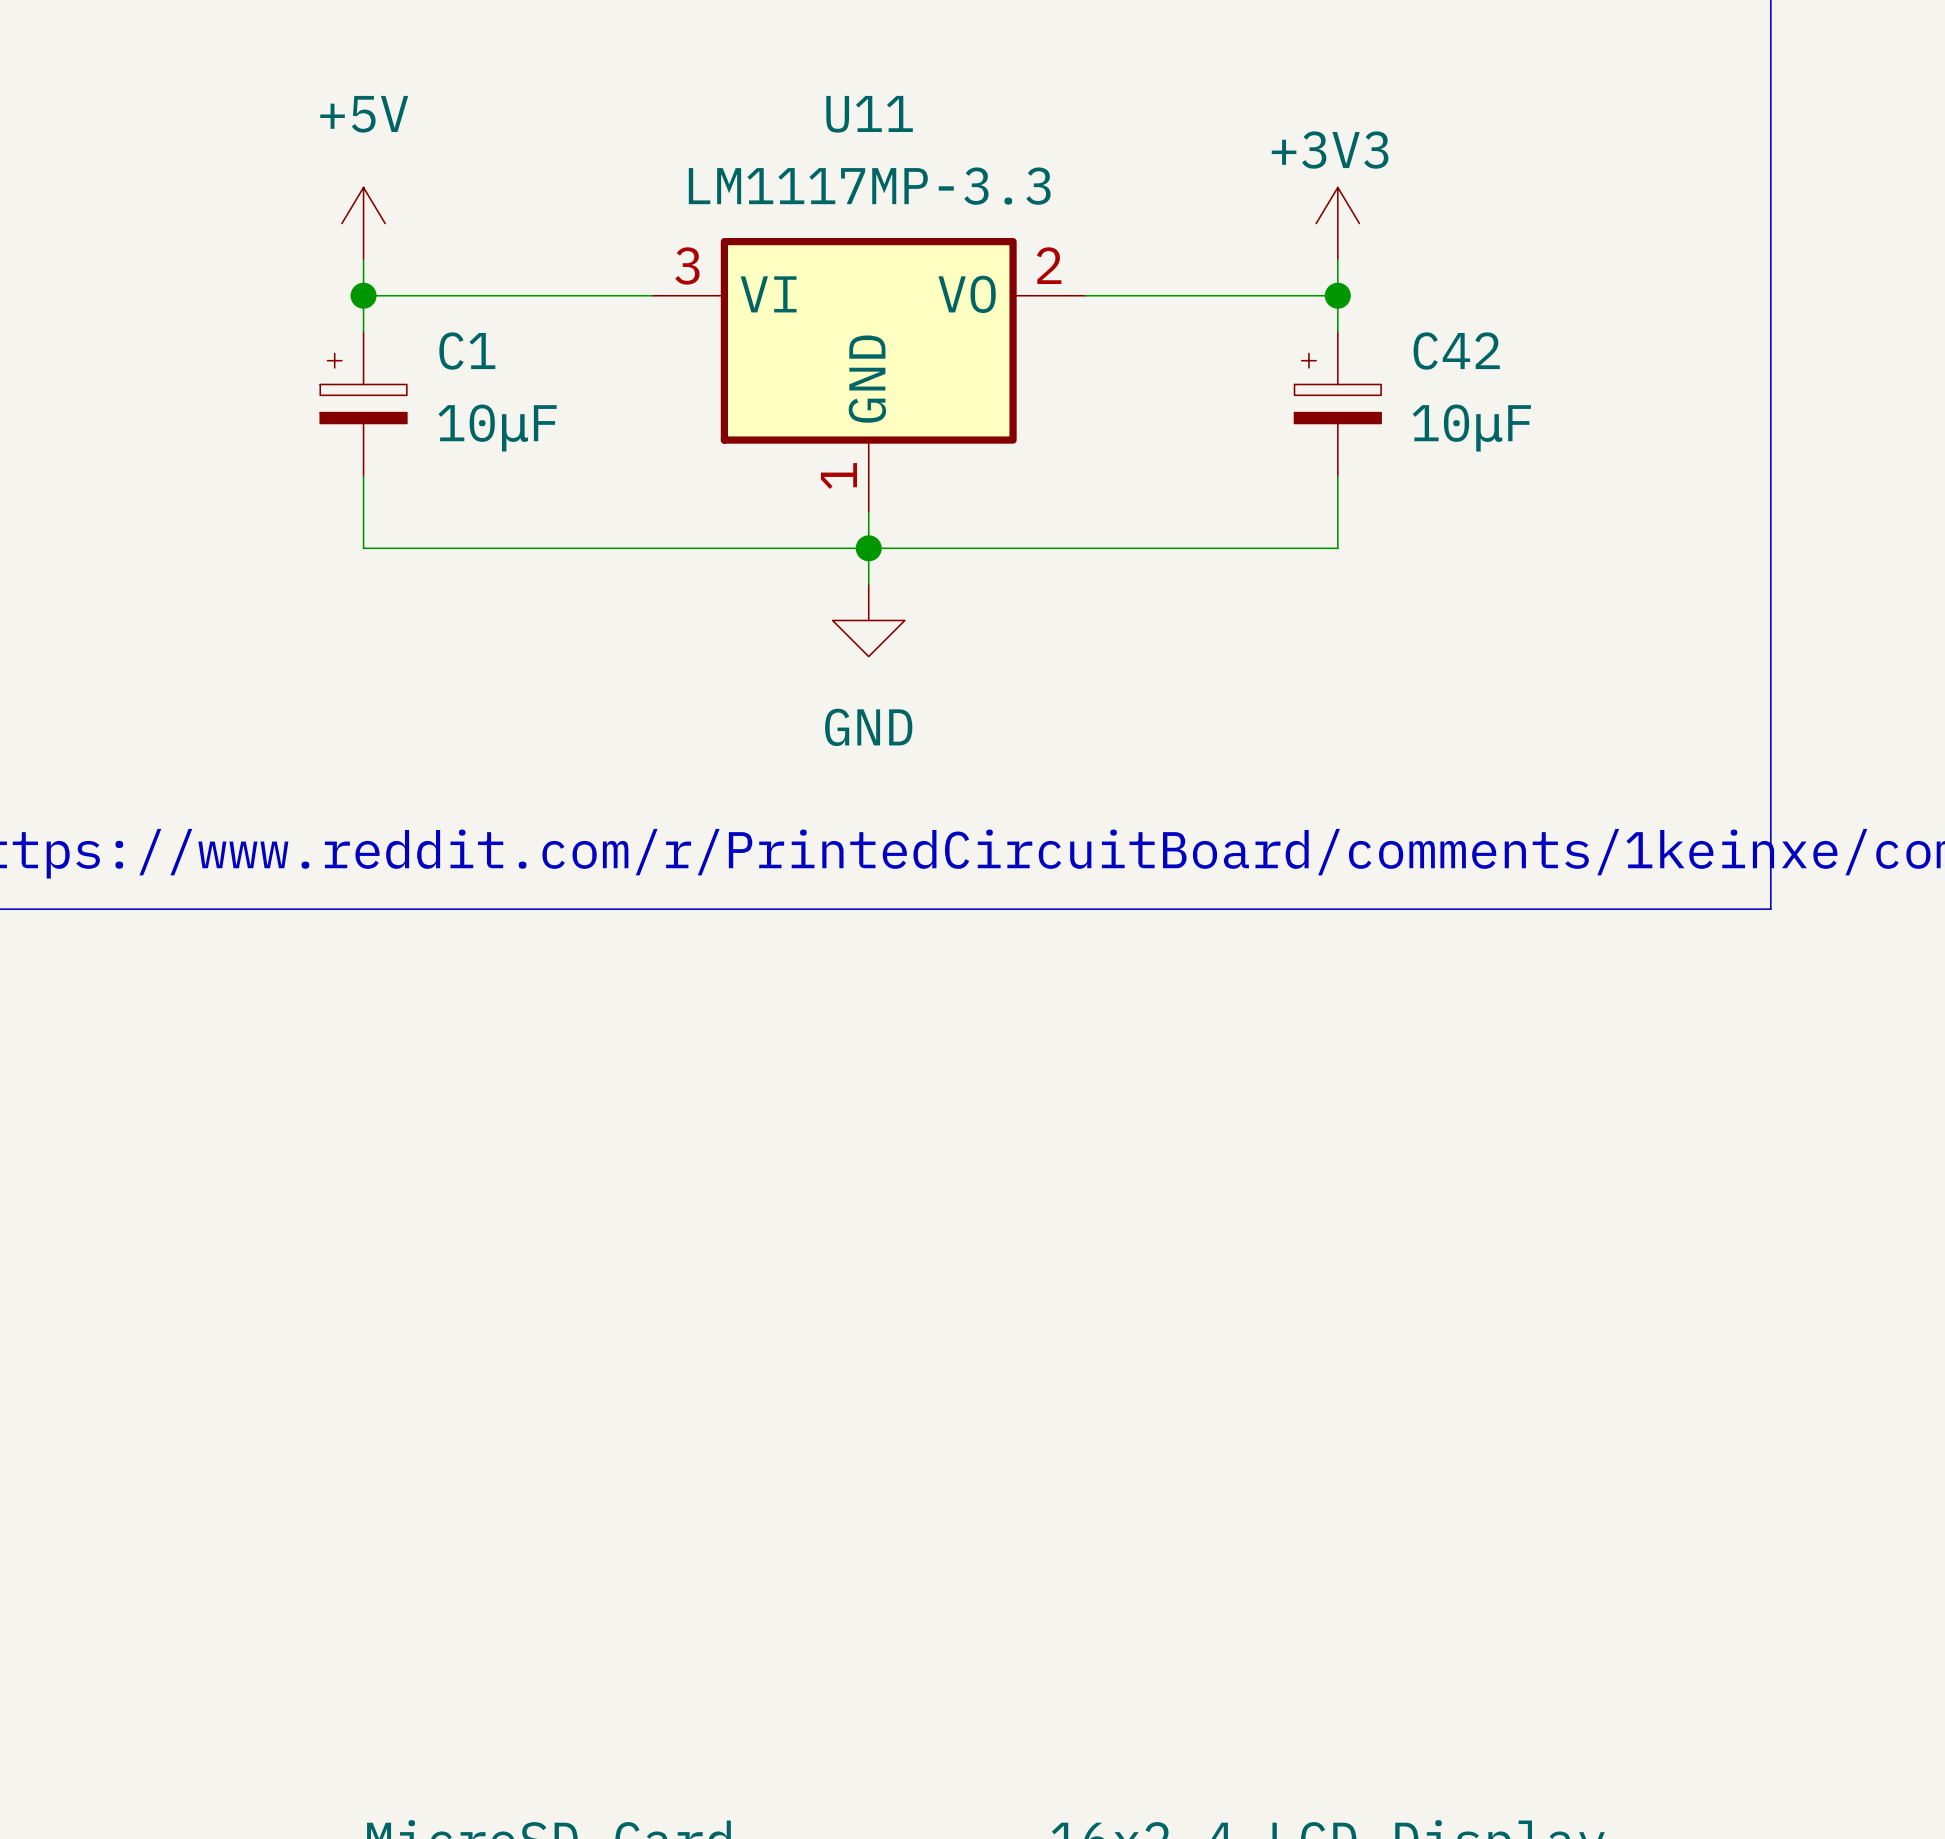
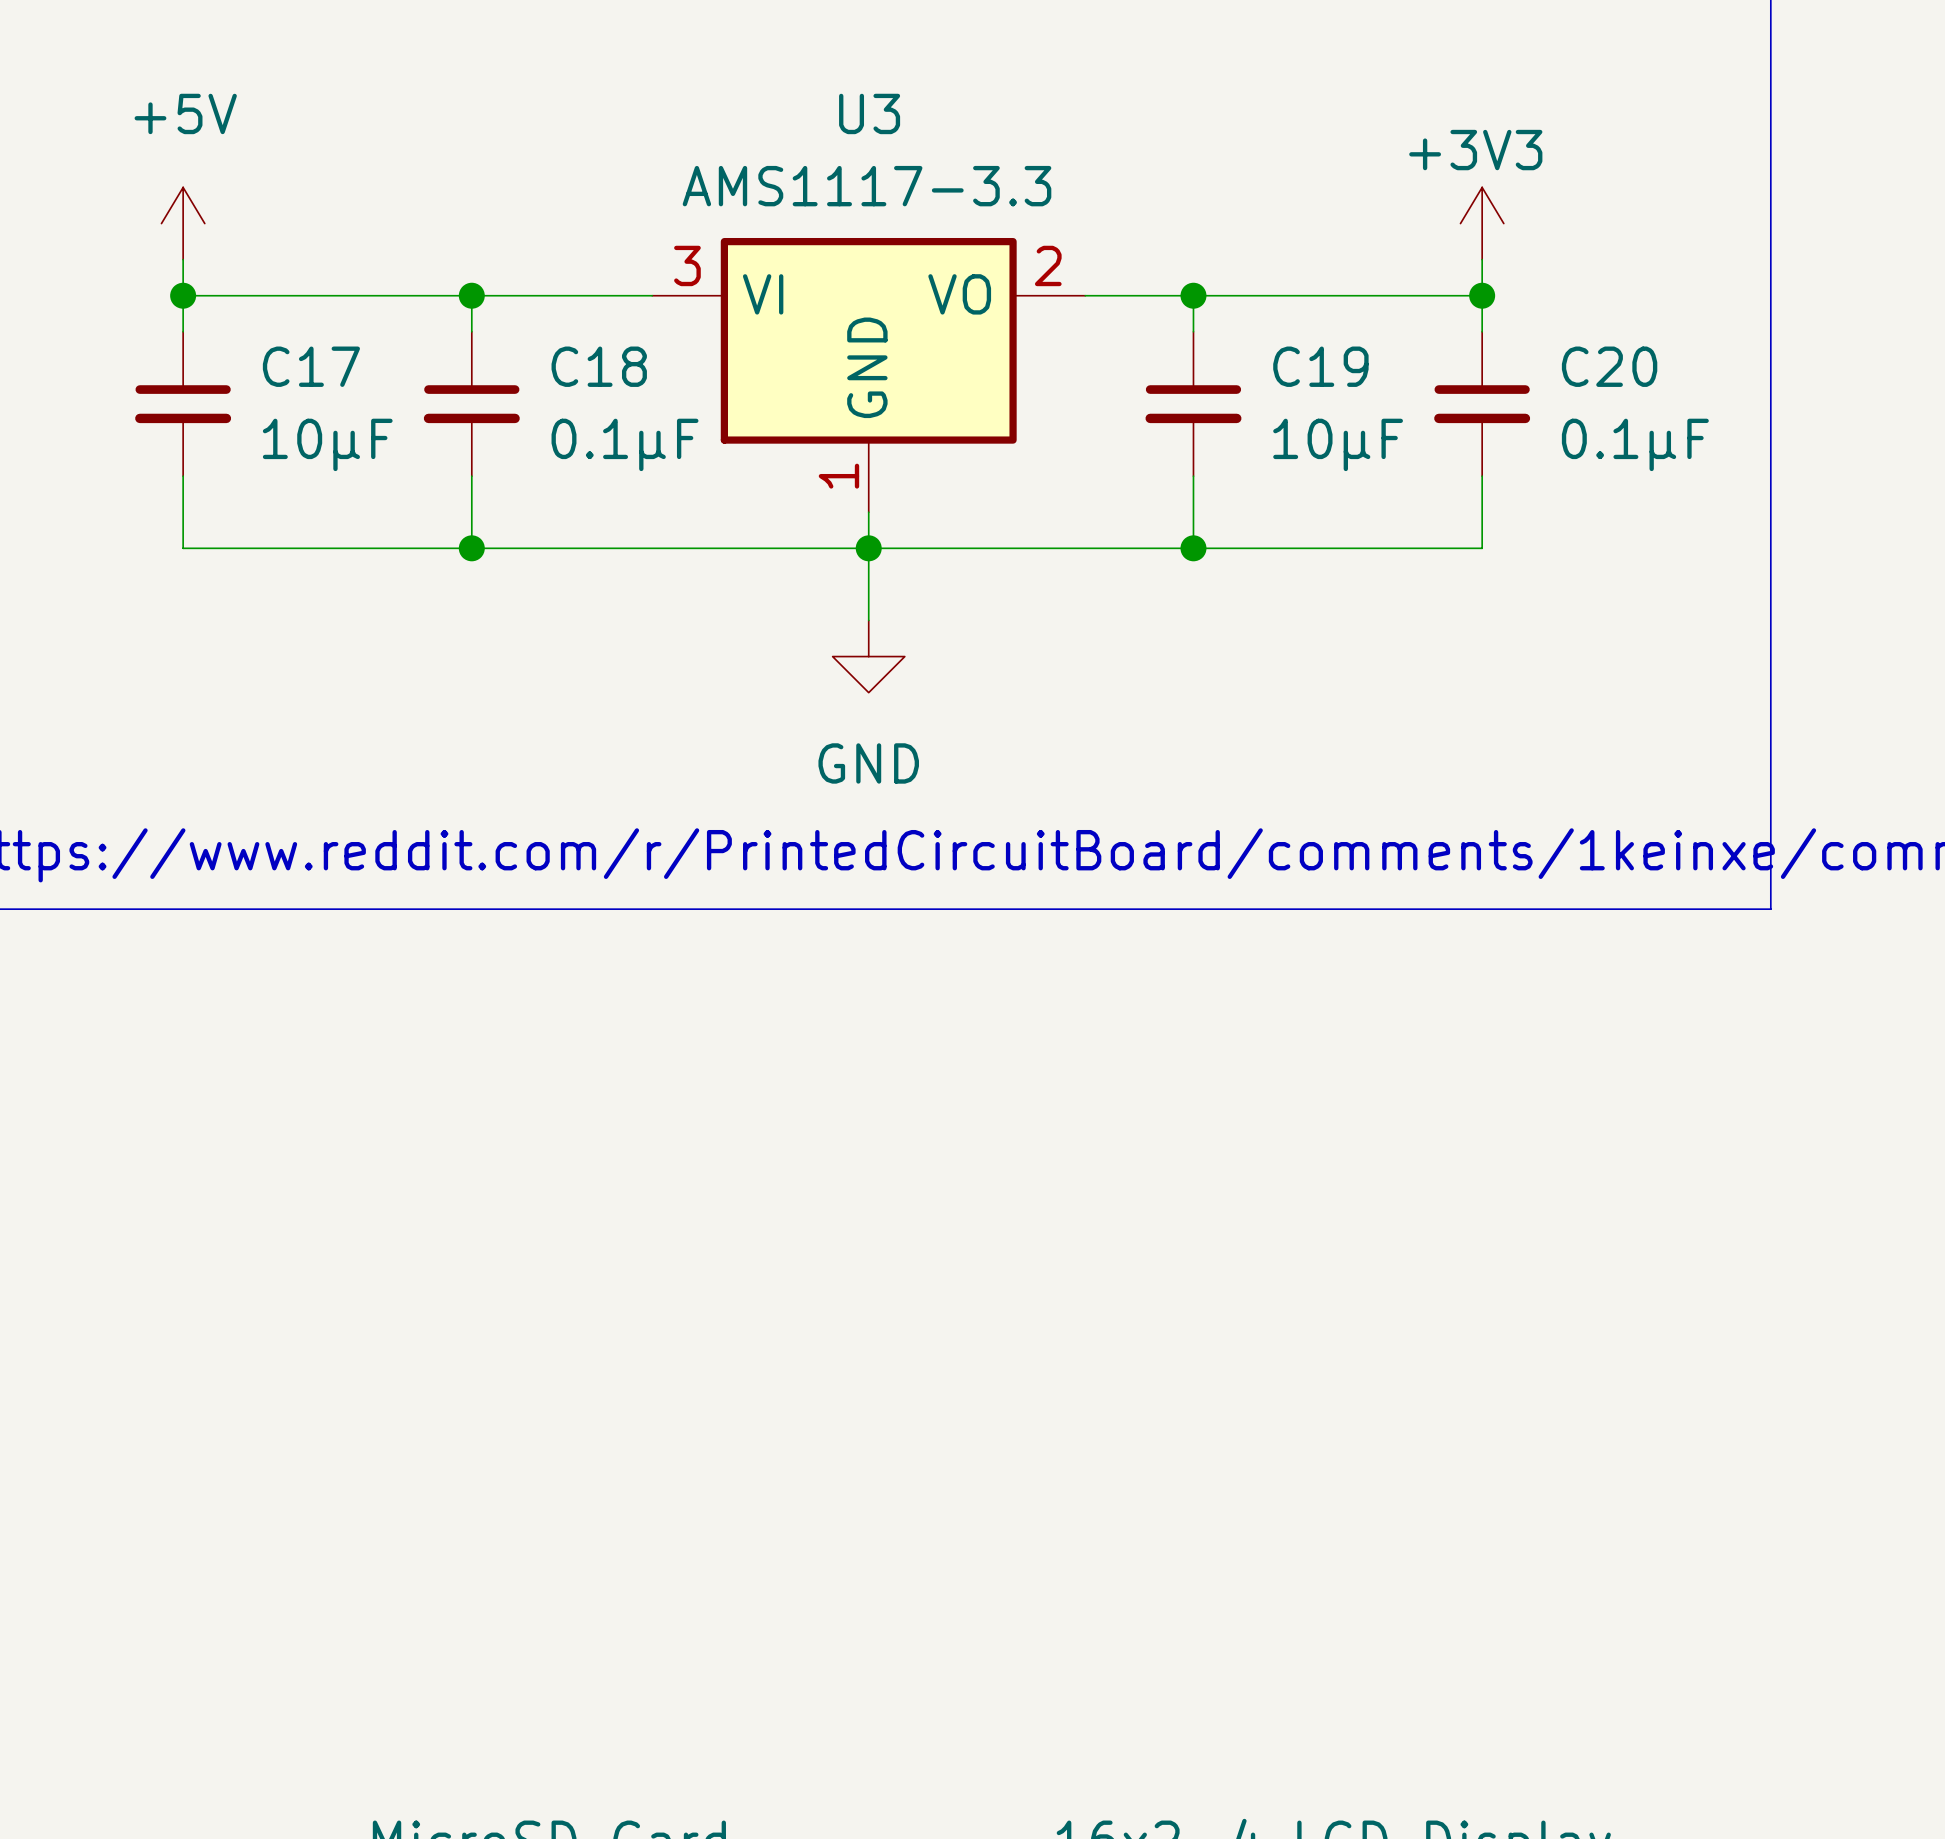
U11 name: U11 (869, 114) -> U3 (869, 113)
U11 value: LM1117MP-3.3 (869, 186) -> AMS1117-3.3 (867, 186)
power symbol position: +5V (363, 223) -> +5V (183, 223)
power symbol position: +3V3 (1337, 223) -> +3V3 (1482, 223)
wire: (363, 259) (363, 331) -> (183, 259) (183, 331)
wire: (1337, 259) (1337, 331) -> (1482, 259) (1482, 331)
wire: none -> (183, 295) (363, 295)
junction: none -> (183, 295)
junction: (363, 295) -> none
wire: none -> (471, 295) (471, 331)
junction: none -> (471, 295)
wire: none -> (1193, 295) (1193, 331)
junction: none -> (1193, 295)
wire: none -> (1337, 295) (1482, 295)
junction: (1337, 295) -> none
junction: none -> (1482, 295)
C17: none -> 10μF (183, 403)
C1: 10μF (363, 403) -> none
C18: none -> 0.1μF (471, 403)
C19: none -> 10μF (1193, 403)
C42: 10μF (1337, 403) -> none
C20: none -> 0.1μF (1482, 403)
wire: (363, 476) (363, 548) -> (183, 476) (183, 548) (363, 548)
wire: none -> (471, 476) (471, 548)
wire: none -> (1193, 476) (1193, 548)
wire: (1337, 476) (1337, 548) -> (1482, 476) (1482, 548) (1337, 548)
junction: none -> (471, 548)
junction: none -> (1193, 548)
power symbol position: GND (868, 620) -> GND (868, 656)

